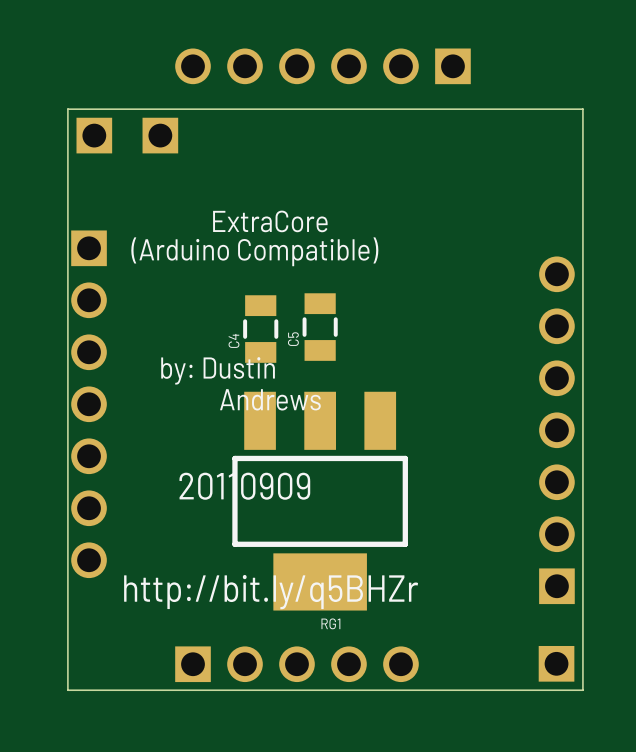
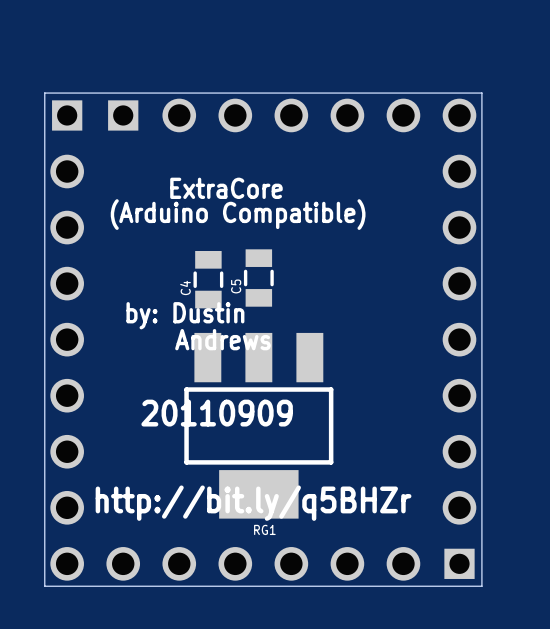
part: (322, 66) -> none
part: none -> (319, 115)
part footprint: [71, 230, 107, 579] -> [50, 154, 84, 525]
part: none -> (459, 339)
part: (556, 430) -> none
part footprint: [175, 646, 419, 683] -> [50, 547, 421, 581]

